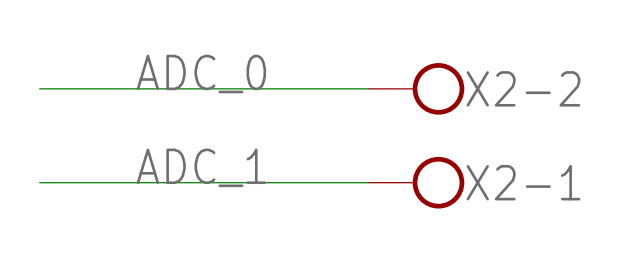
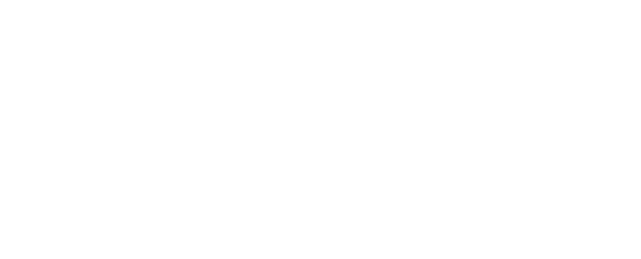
label: ADC_0 (201, 74) -> none
wire: (39, 88) (368, 88) -> none
X2-2: (416, 88) -> none
label: ADC_1 (201, 167) -> none
wire: (39, 182) (368, 182) -> none
X2-1: (416, 182) -> none

